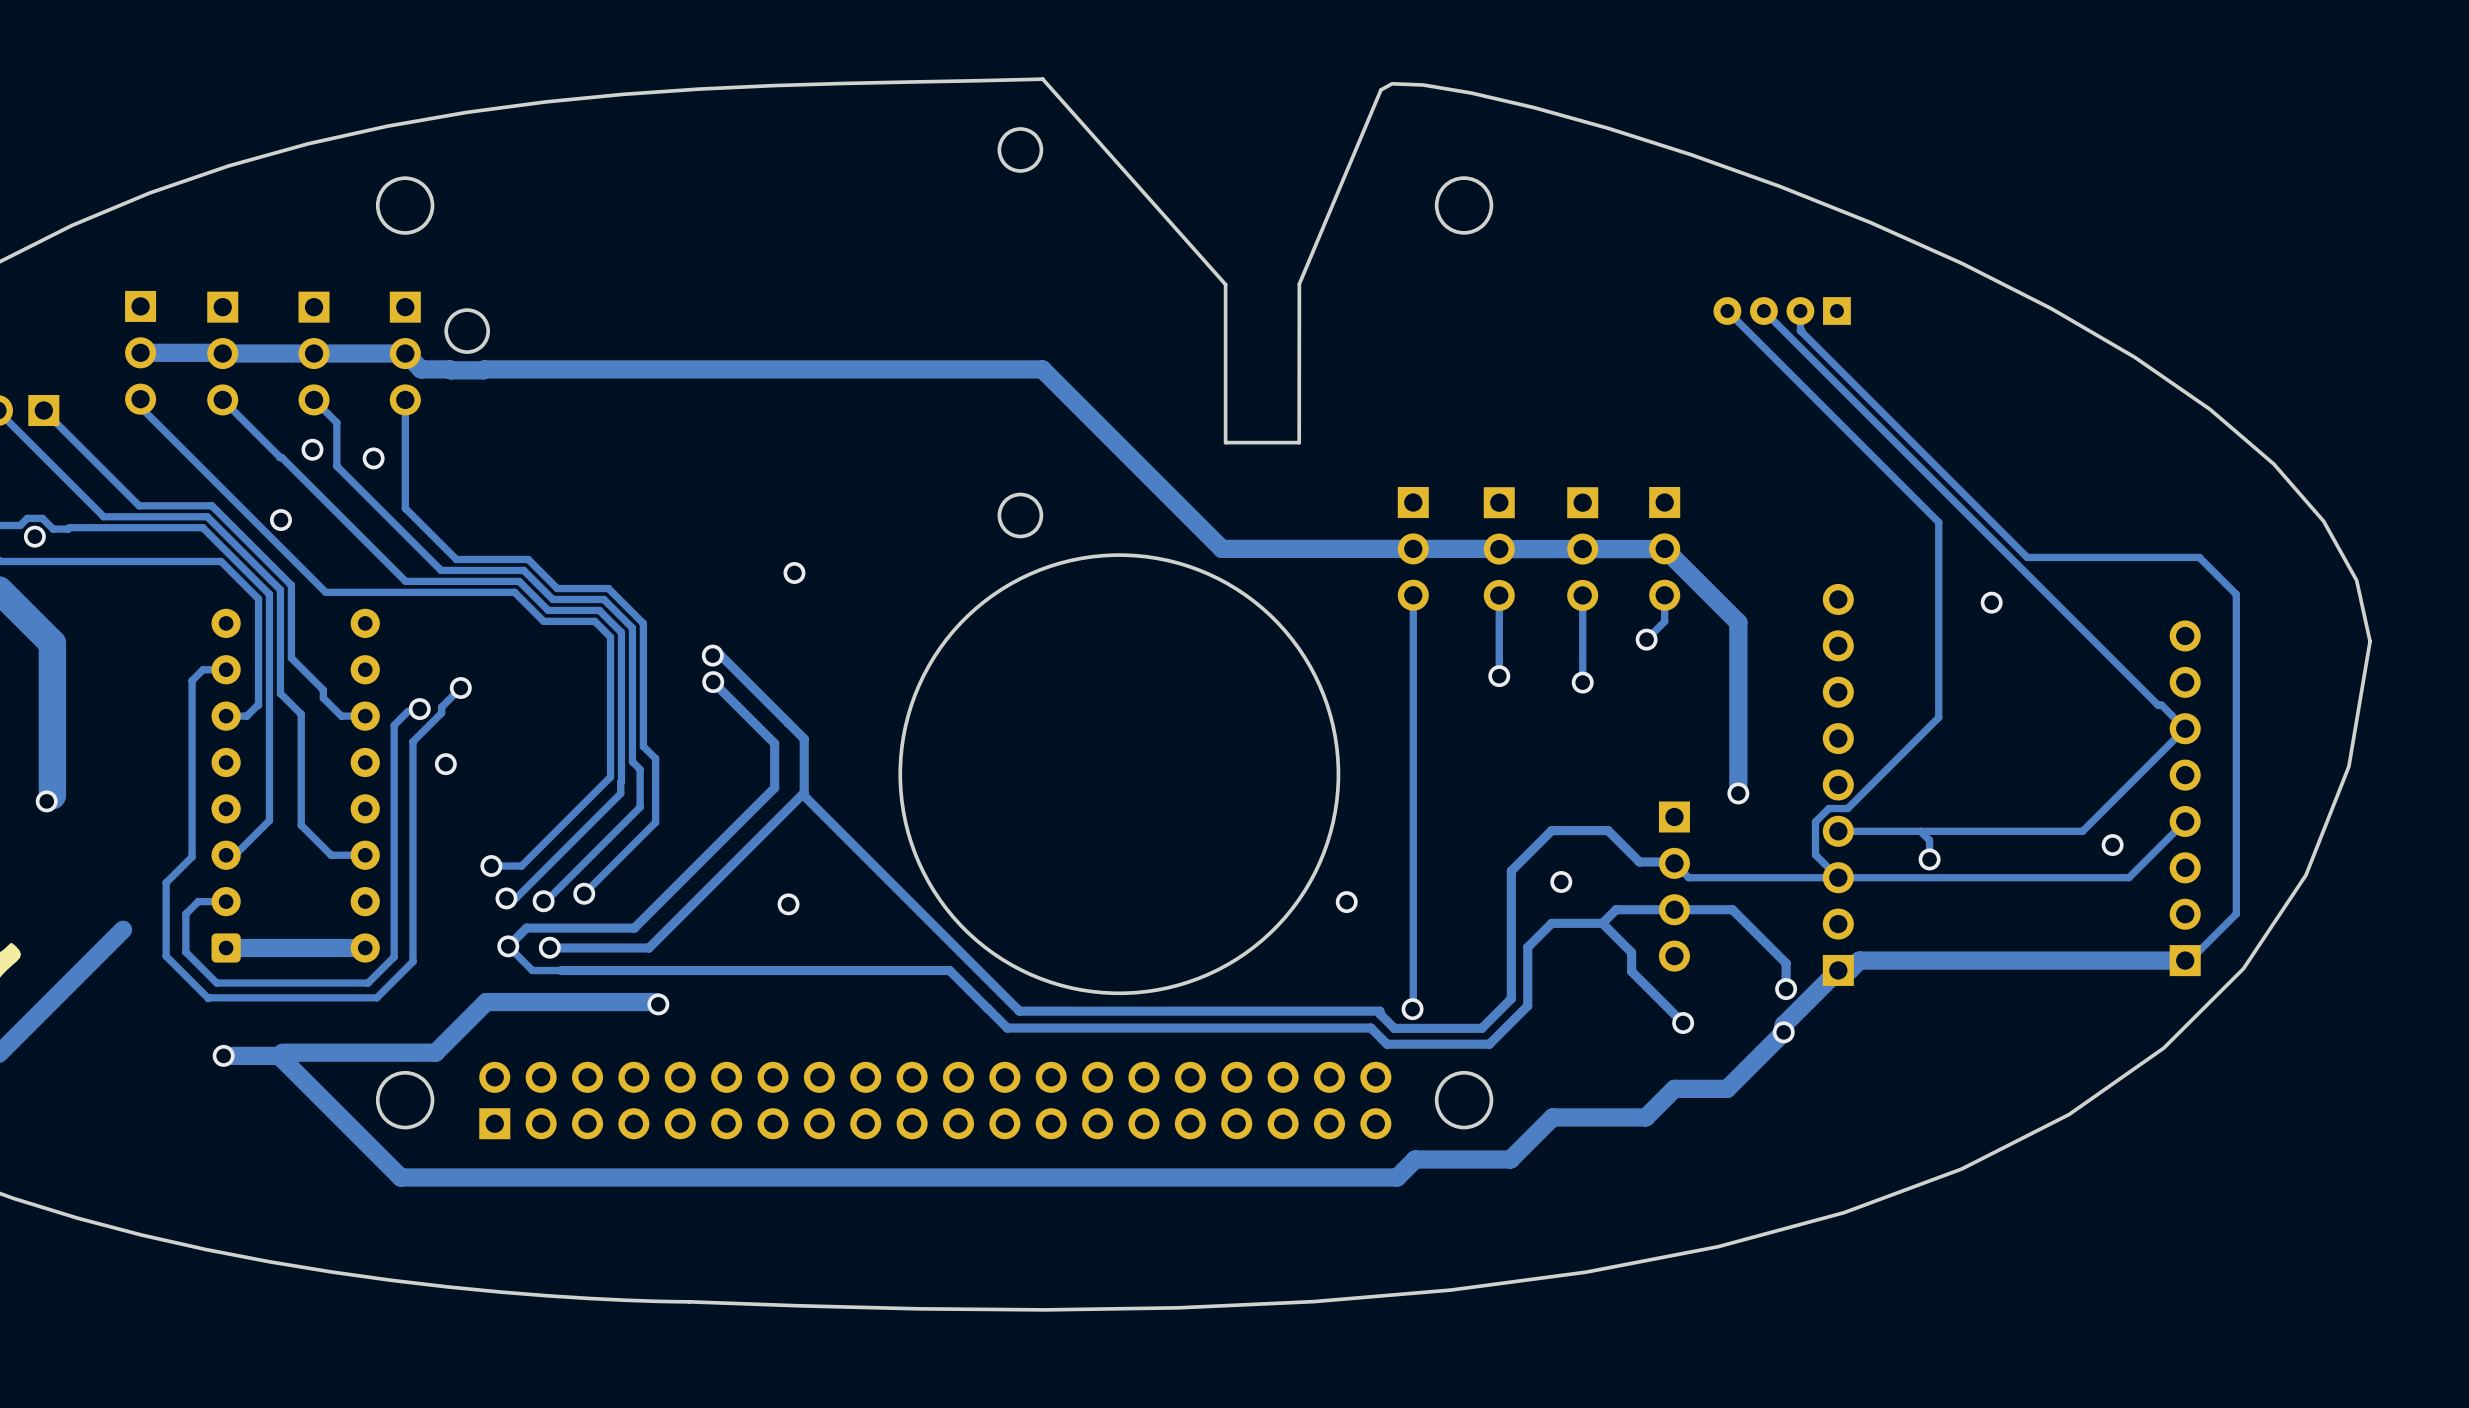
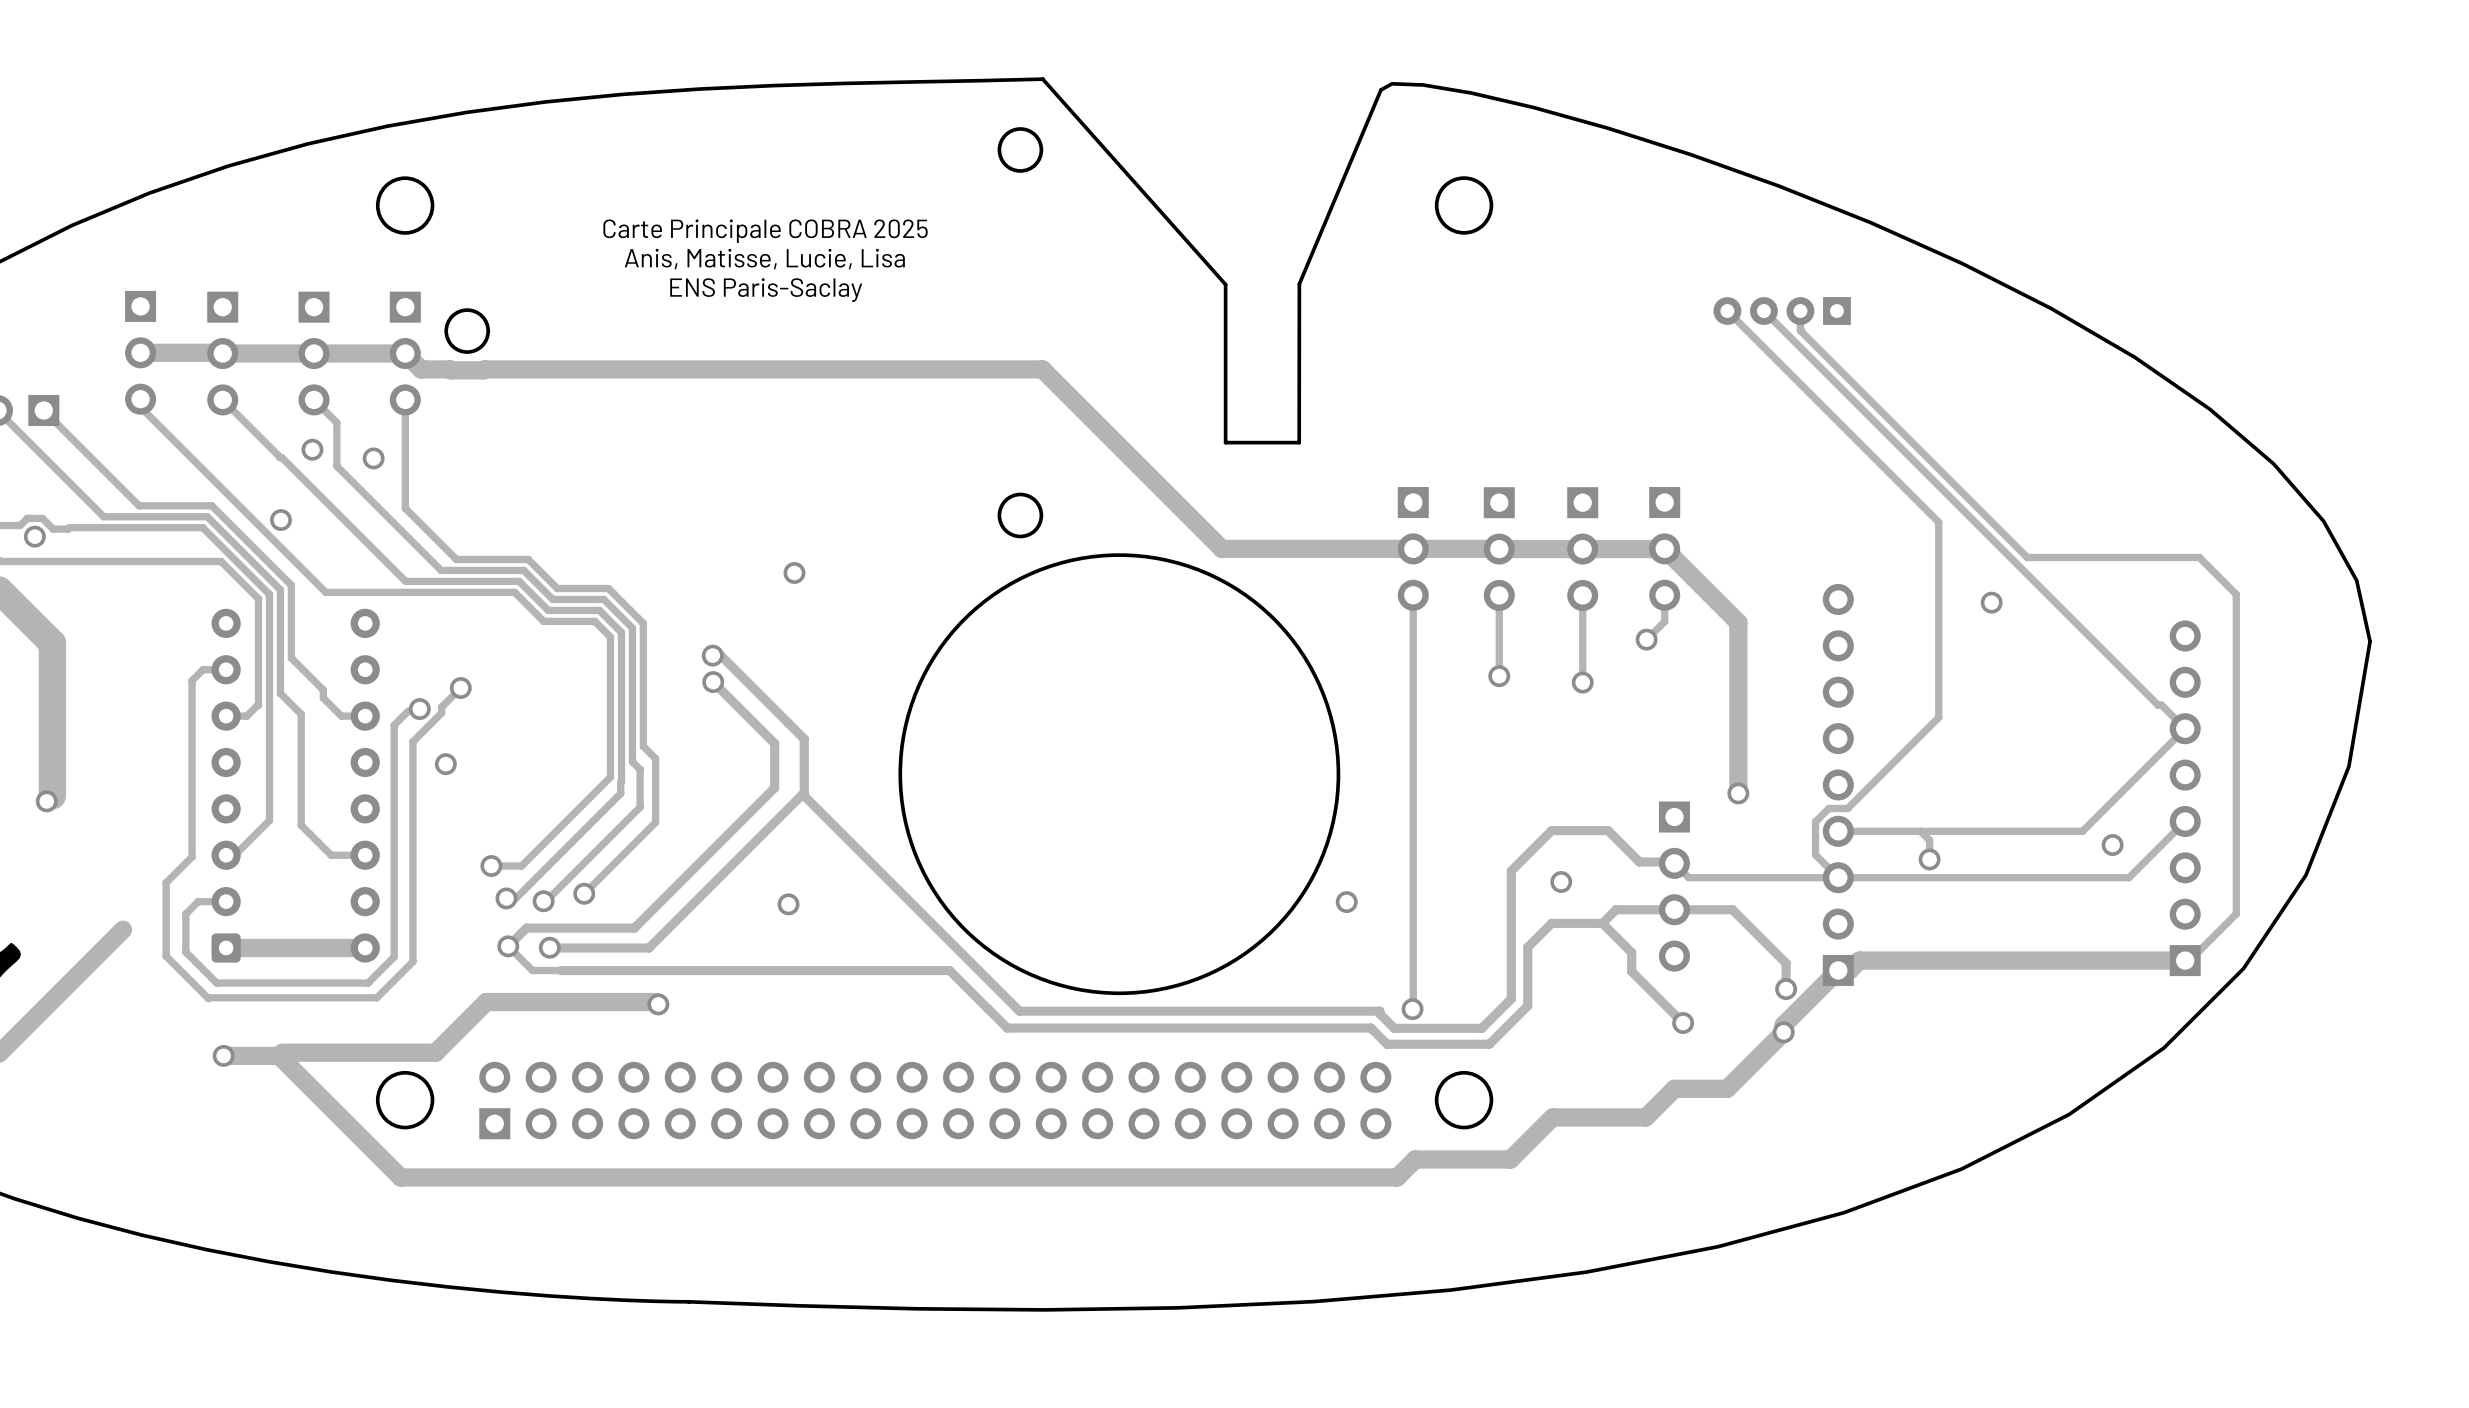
text: none -> Carte Principale COBRA 2025 (765, 231)
text: none -> Anis, Matisse, Lucie, Lisa (764, 259)
text: none -> ENS Paris-Saclay (766, 290)

